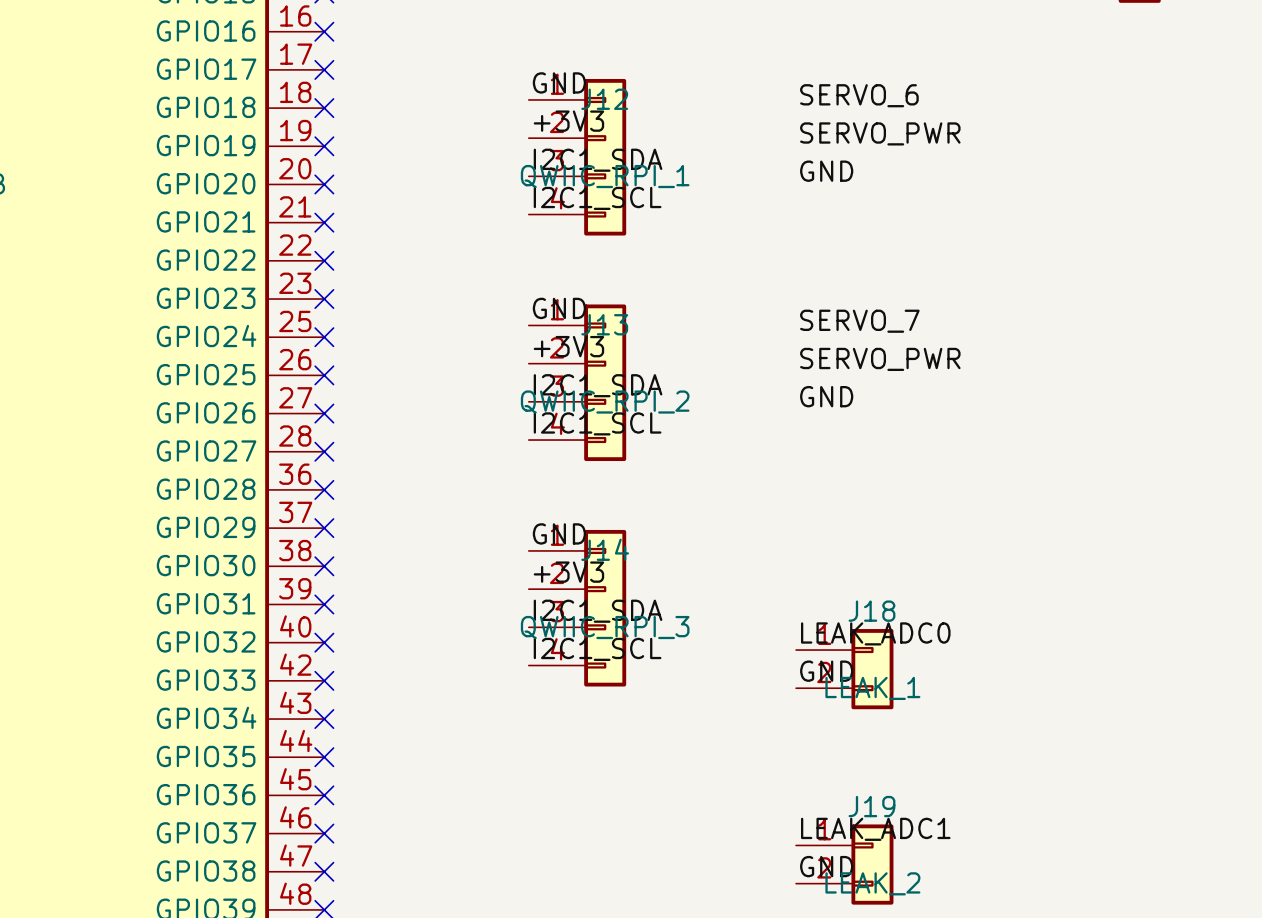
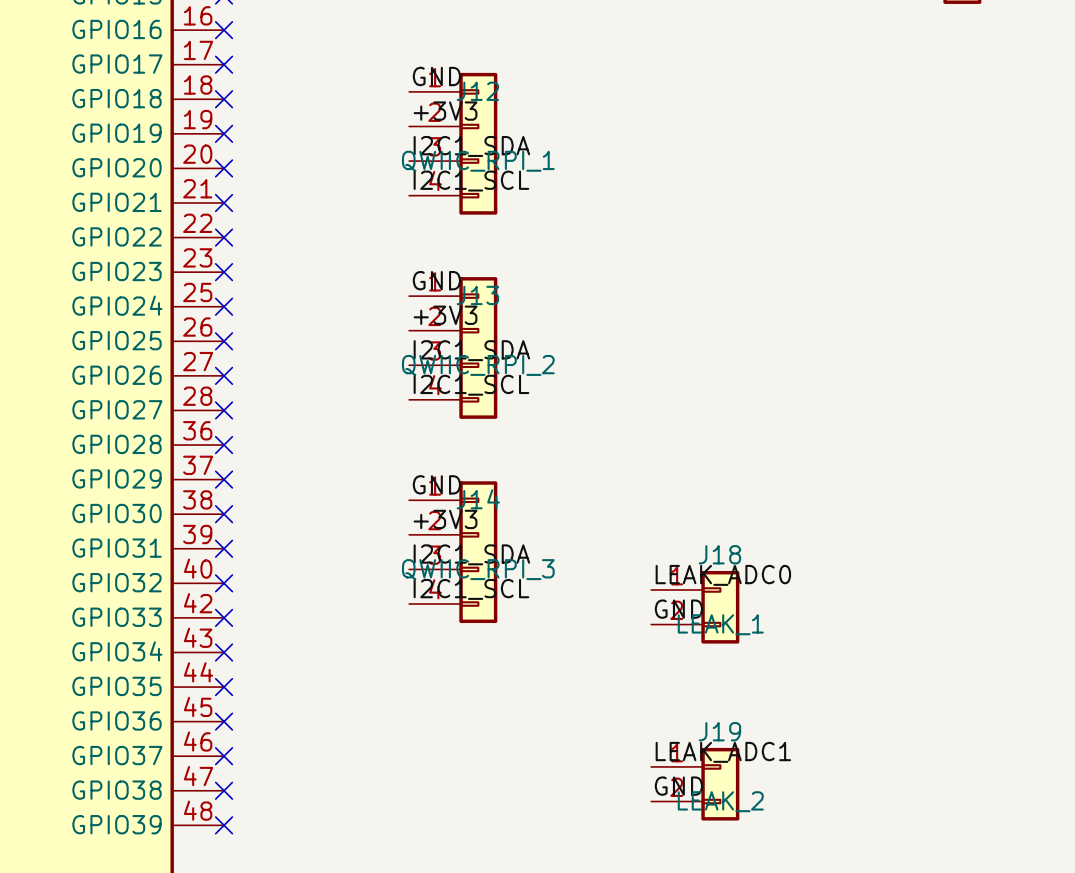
label: SERVO_6 (859, 95) -> none
label: SERVO_PWR (880, 133) -> none
label: GND (826, 171) -> none
label: SERVO_7 (859, 321) -> none
label: SERVO_PWR (880, 359) -> none
label: GND (826, 396) -> none

